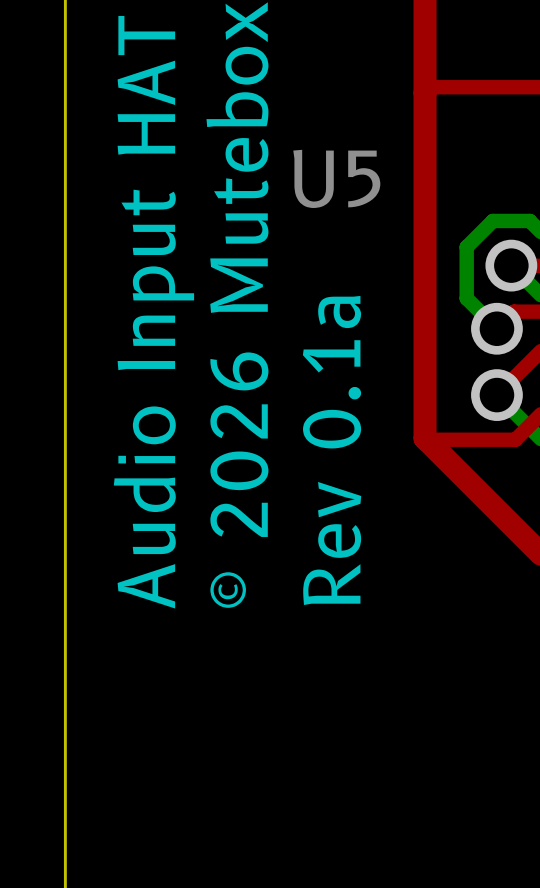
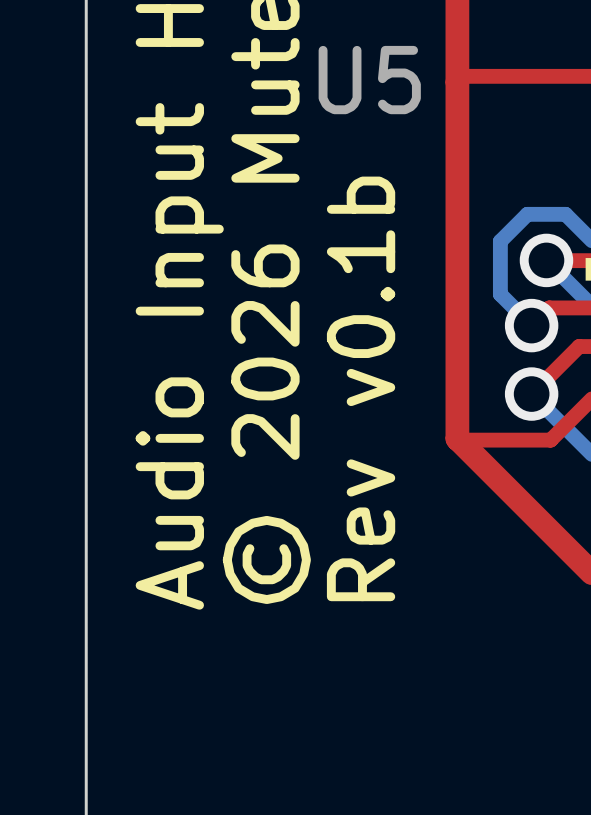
U5 name position: U5 (336, 178) -> U5 (369, 80)
text: Rev 0.1a (332, 450) -> Rev v0.1b (361, 388)

